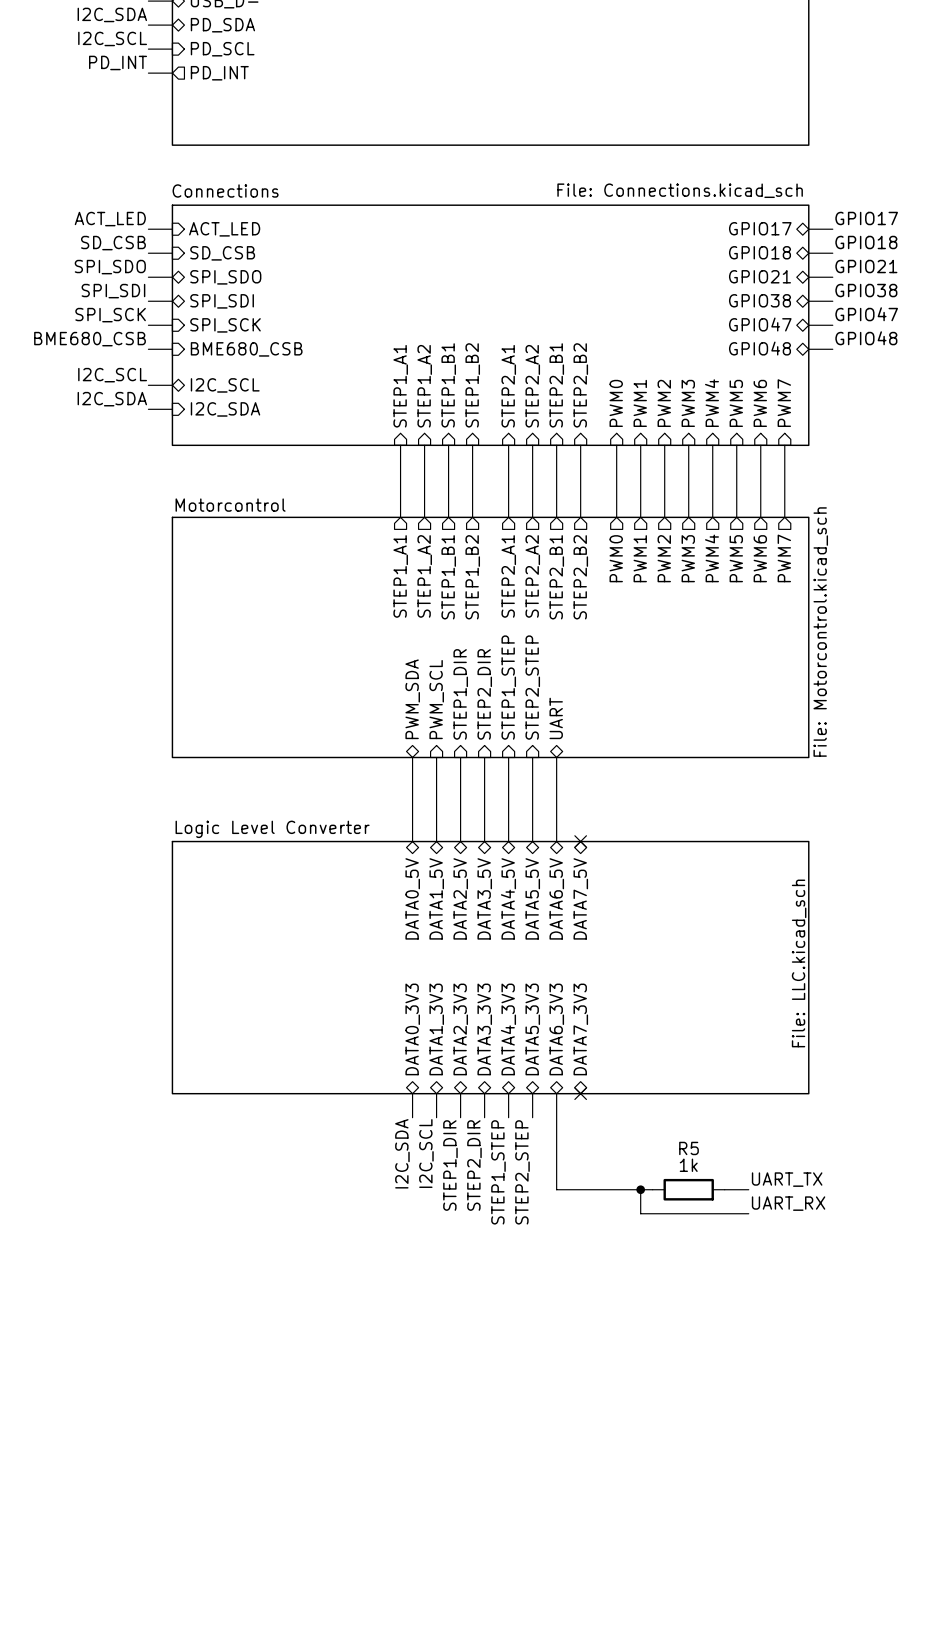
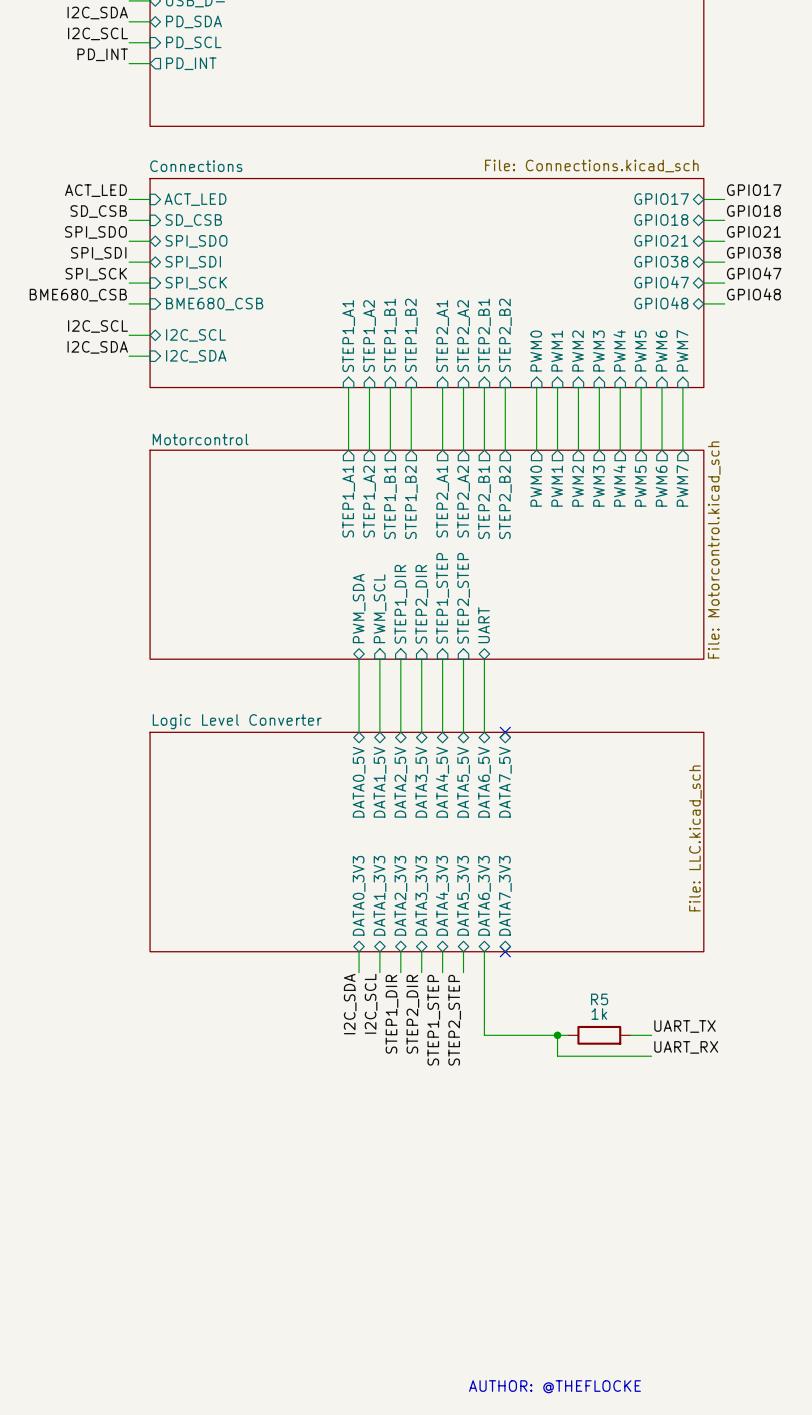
text: none -> AUTHOR: @THEFLOCKE (554, 1386)

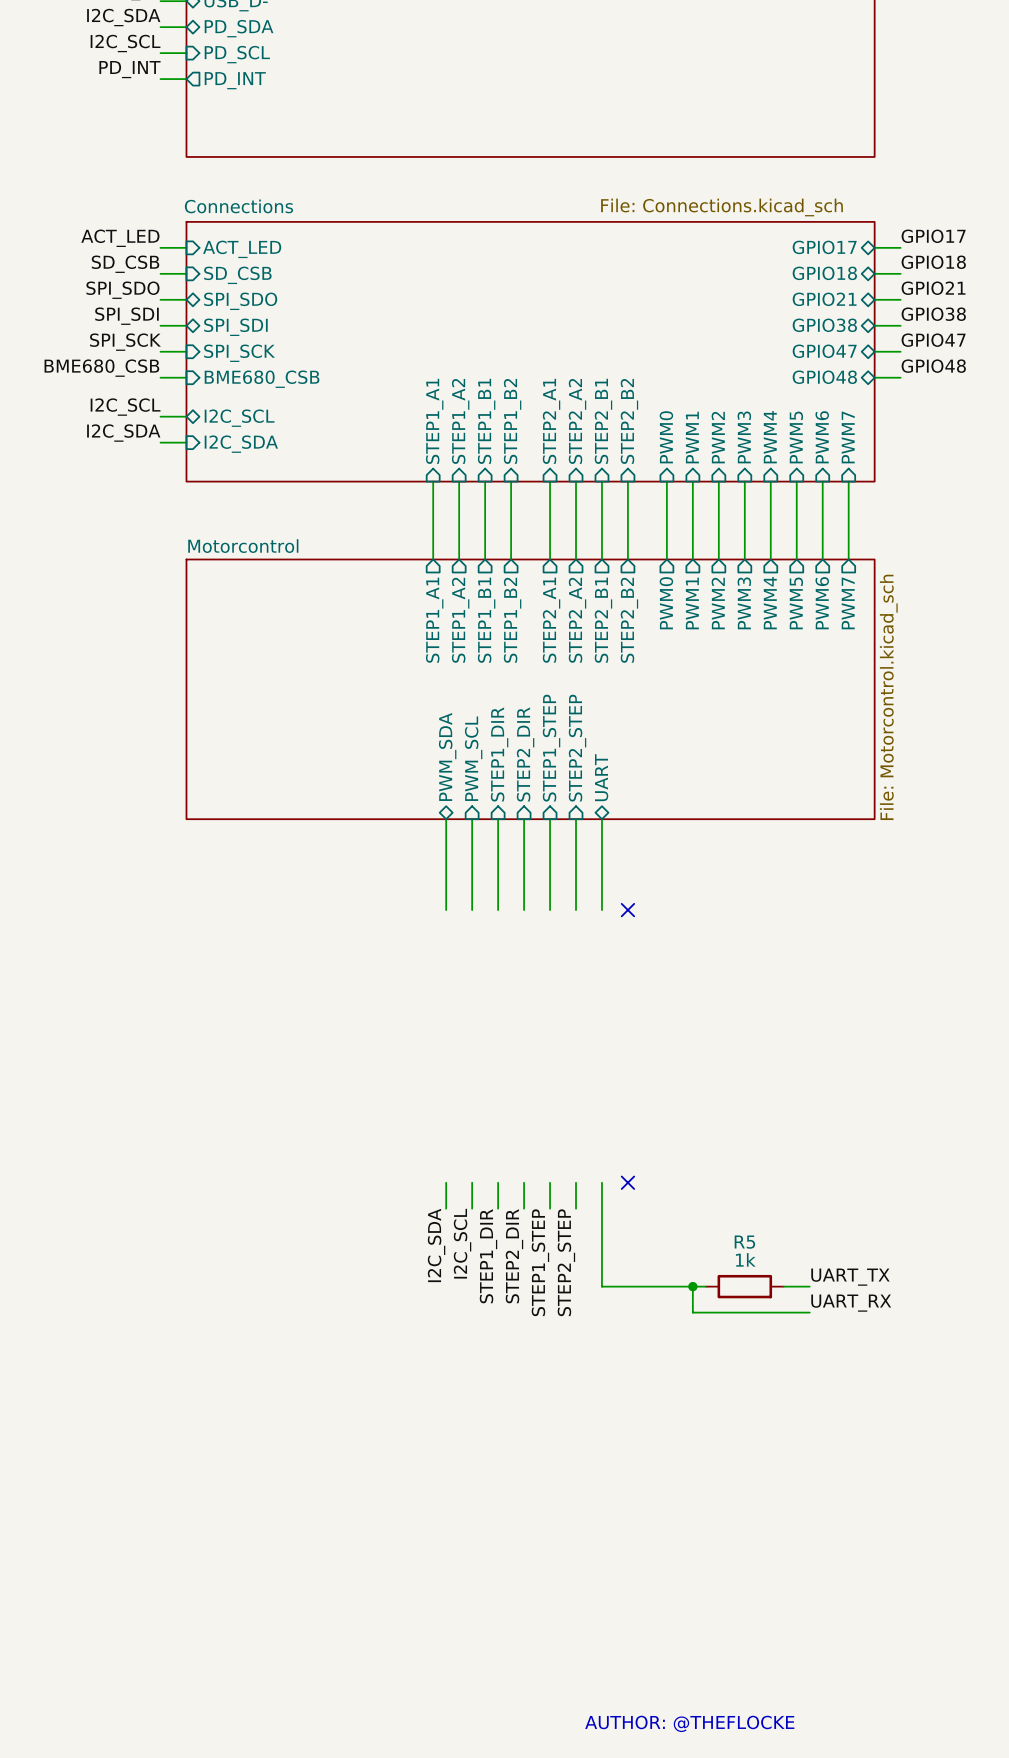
sheet pin: DATA0_5V (359, 782) -> none
sheet pin: DATA1_5V (380, 782) -> none
sheet pin: DATA2_5V (400, 782) -> none
sheet pin: DATA3_5V (421, 782) -> none
sheet pin: DATA4_5V (442, 782) -> none
sheet pin: DATA5_5V (463, 782) -> none
sheet pin: DATA6_5V (484, 782) -> none
sheet pin: DATA7_5V (505, 782) -> none
sheet Logic Level Converter: File: LLC.kicad_sch (426, 842) -> none
sheet pin: DATA0_3V3 (359, 895) -> none
sheet pin: DATA1_3V3 (380, 895) -> none
sheet pin: DATA2_3V3 (400, 895) -> none
sheet pin: DATA3_3V3 (421, 895) -> none
sheet pin: DATA4_3V3 (442, 895) -> none
sheet pin: DATA5_3V3 (463, 895) -> none
sheet pin: DATA6_3V3 (484, 895) -> none
sheet pin: DATA7_3V3 (505, 895) -> none

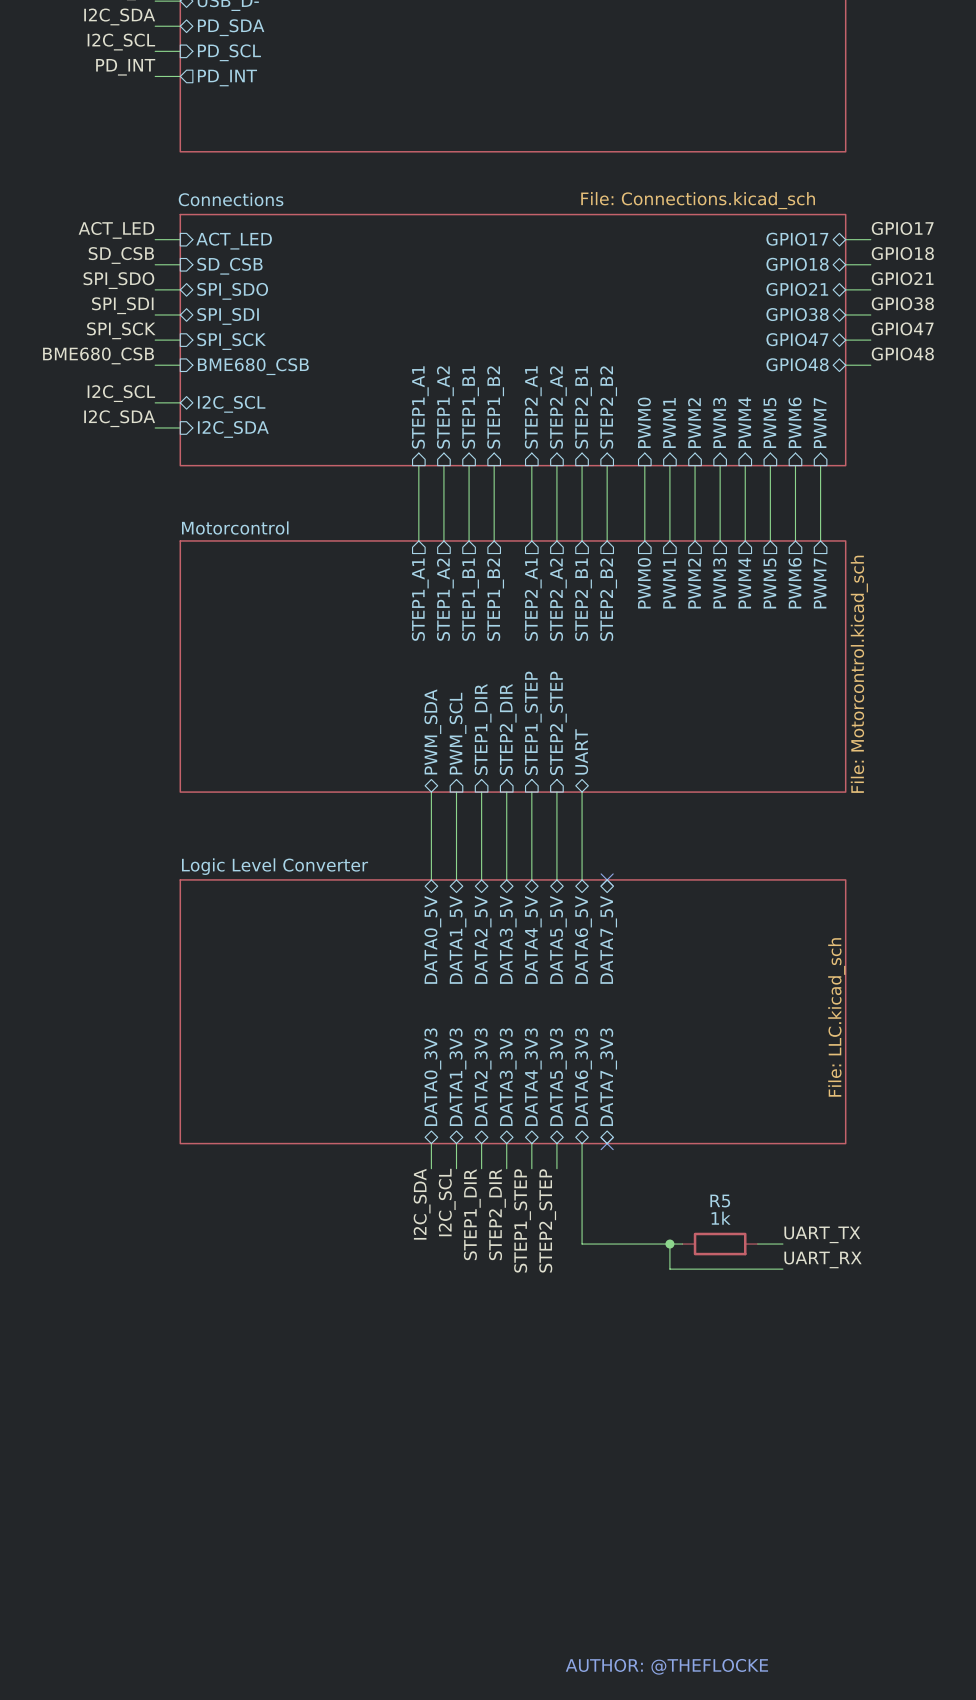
sheet pin: none -> DATA0_5V (432, 939)
sheet pin: none -> DATA1_5V (458, 939)
sheet pin: none -> DATA2_5V (483, 939)
sheet pin: none -> DATA3_5V (508, 939)
sheet pin: none -> DATA4_5V (533, 939)
sheet pin: none -> DATA5_5V (558, 939)
sheet pin: none -> DATA6_5V (583, 939)
sheet pin: none -> DATA7_5V (608, 939)
sheet Logic Level Converter: none -> File: LLC.kicad_sch (513, 1011)
sheet pin: none -> DATA0_3V3 (432, 1077)
sheet pin: none -> DATA1_3V3 (457, 1077)
sheet pin: none -> DATA2_3V3 (483, 1077)
sheet pin: none -> DATA3_3V3 (508, 1077)
sheet pin: none -> DATA4_3V3 (533, 1077)
sheet pin: none -> DATA5_3V3 (558, 1077)
sheet pin: none -> DATA6_3V3 (583, 1077)
sheet pin: none -> DATA7_3V3 (608, 1077)

